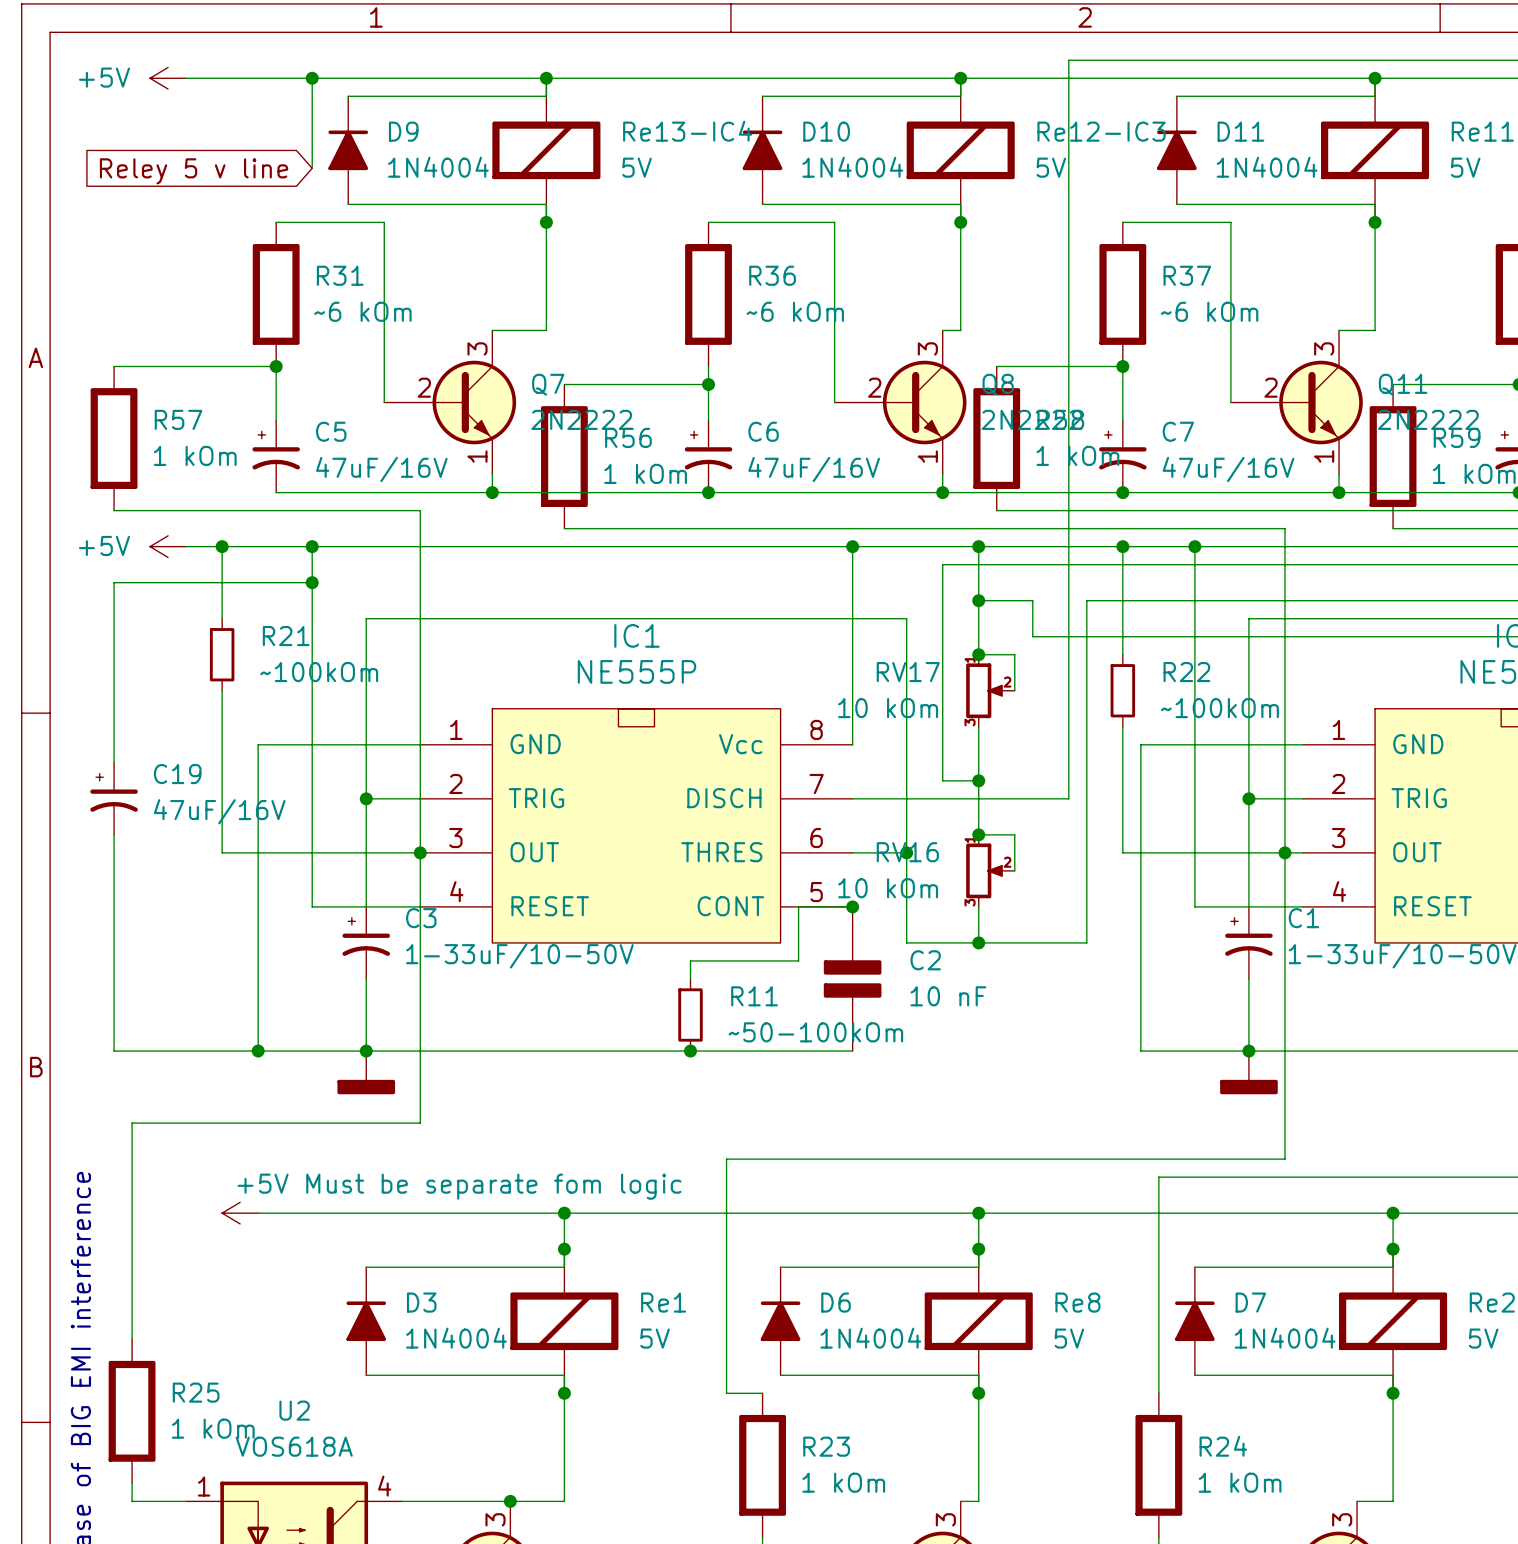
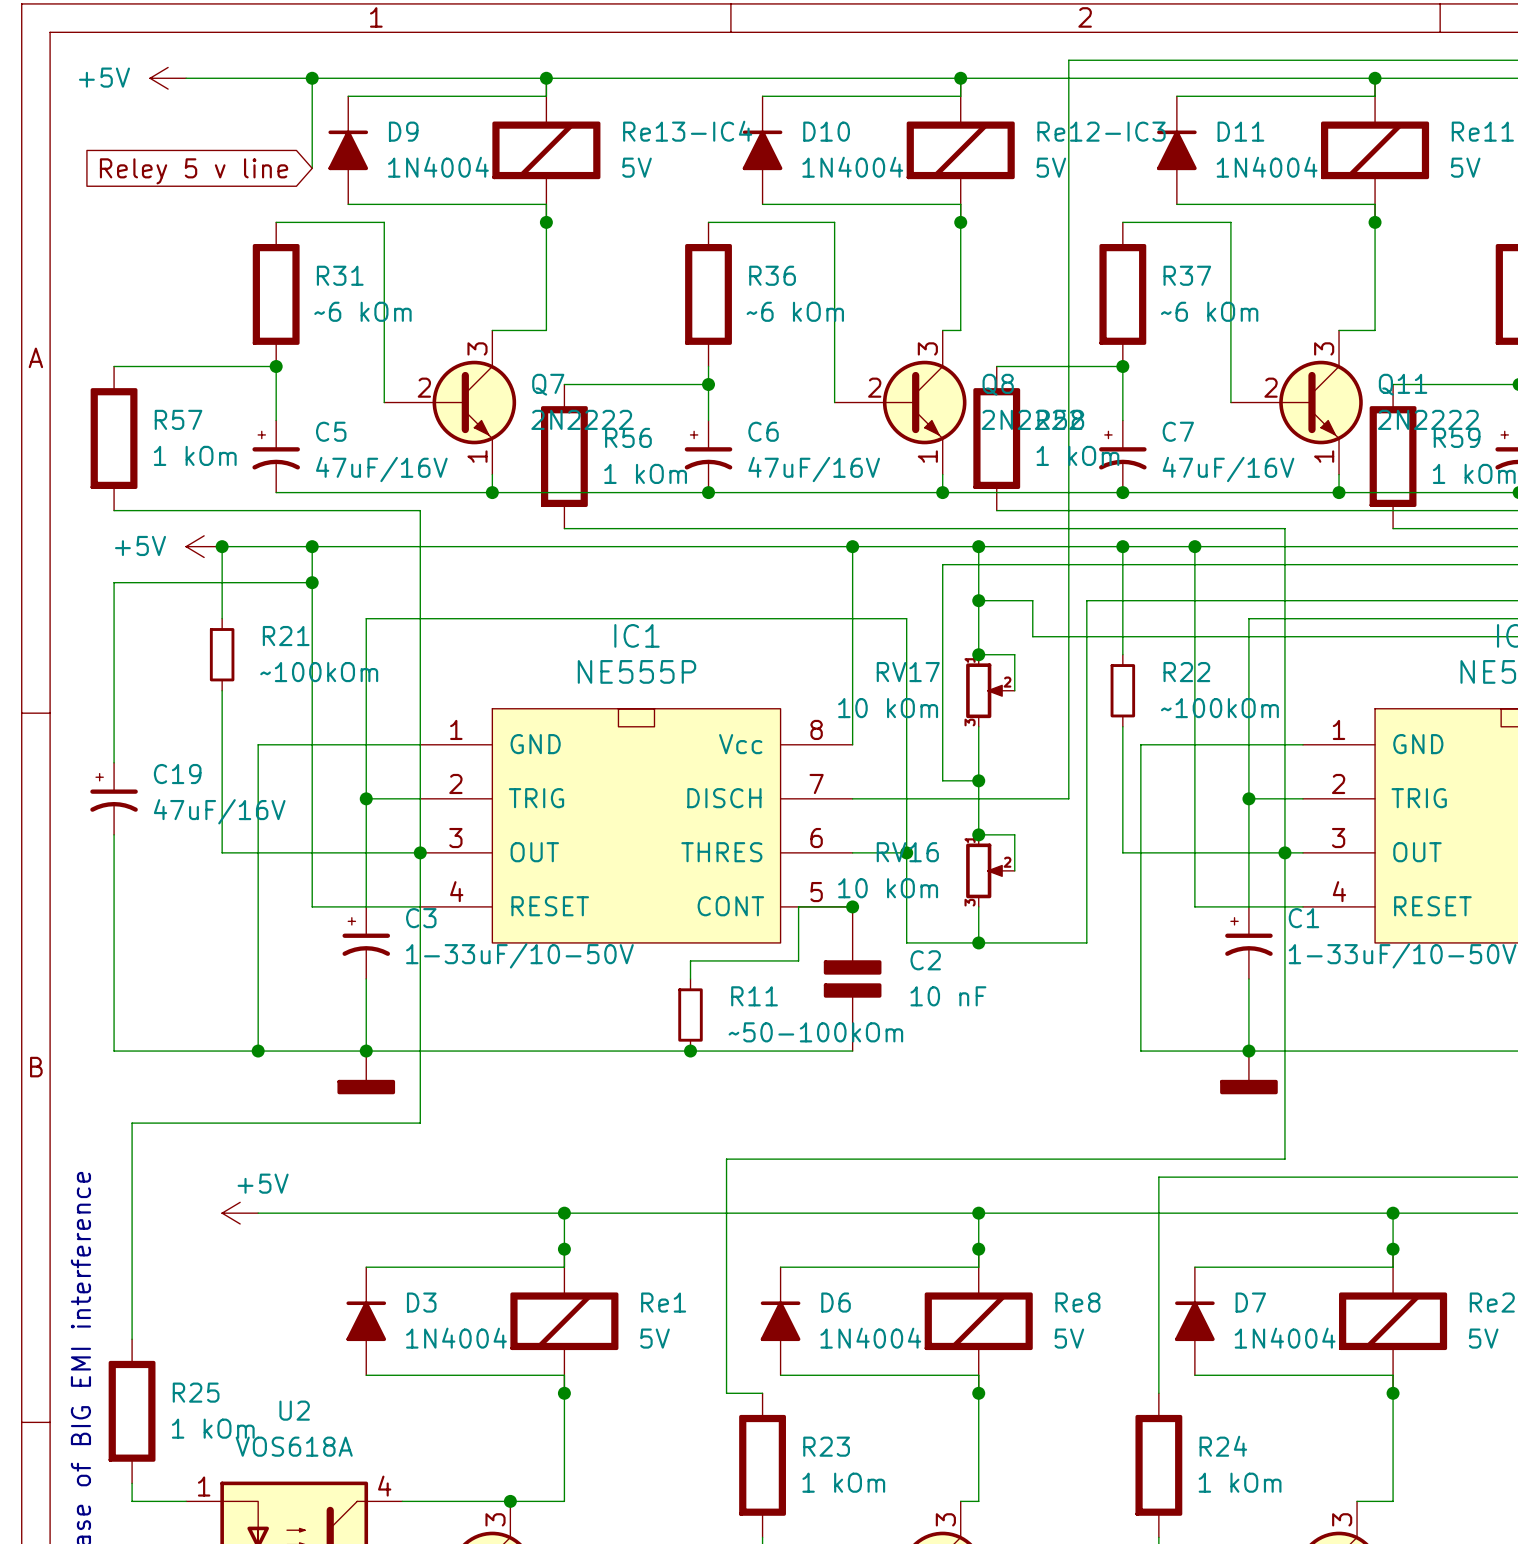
power symbol position: +5V (168, 546) -> +5V (204, 546)
power symbol: +5V Must be separate fom logic (240, 1213) -> +5V (240, 1213)

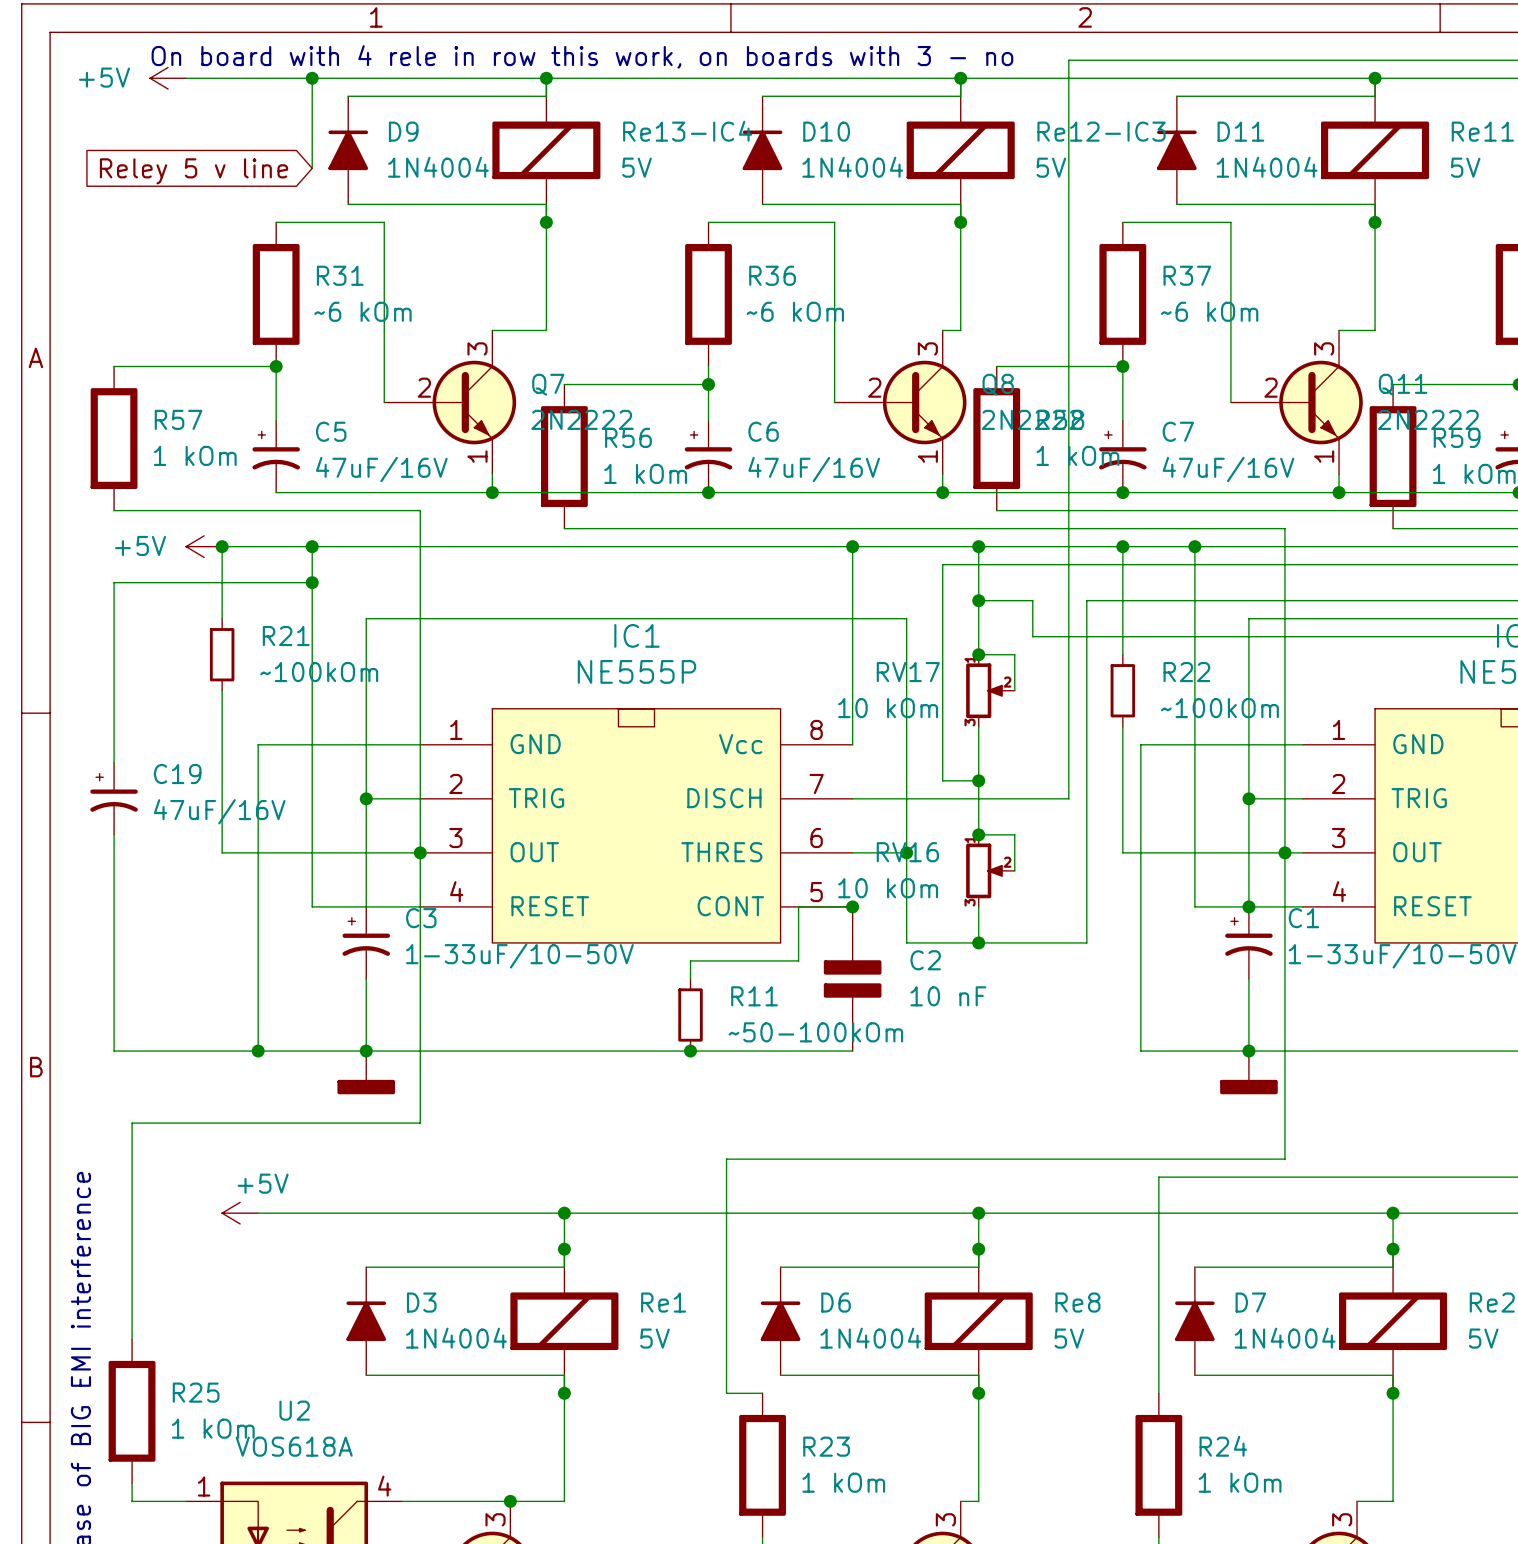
text: none -> On board with 4 rele in row this work, on boards with 3 - no (582, 56)
junction: none -> (1248, 906)

